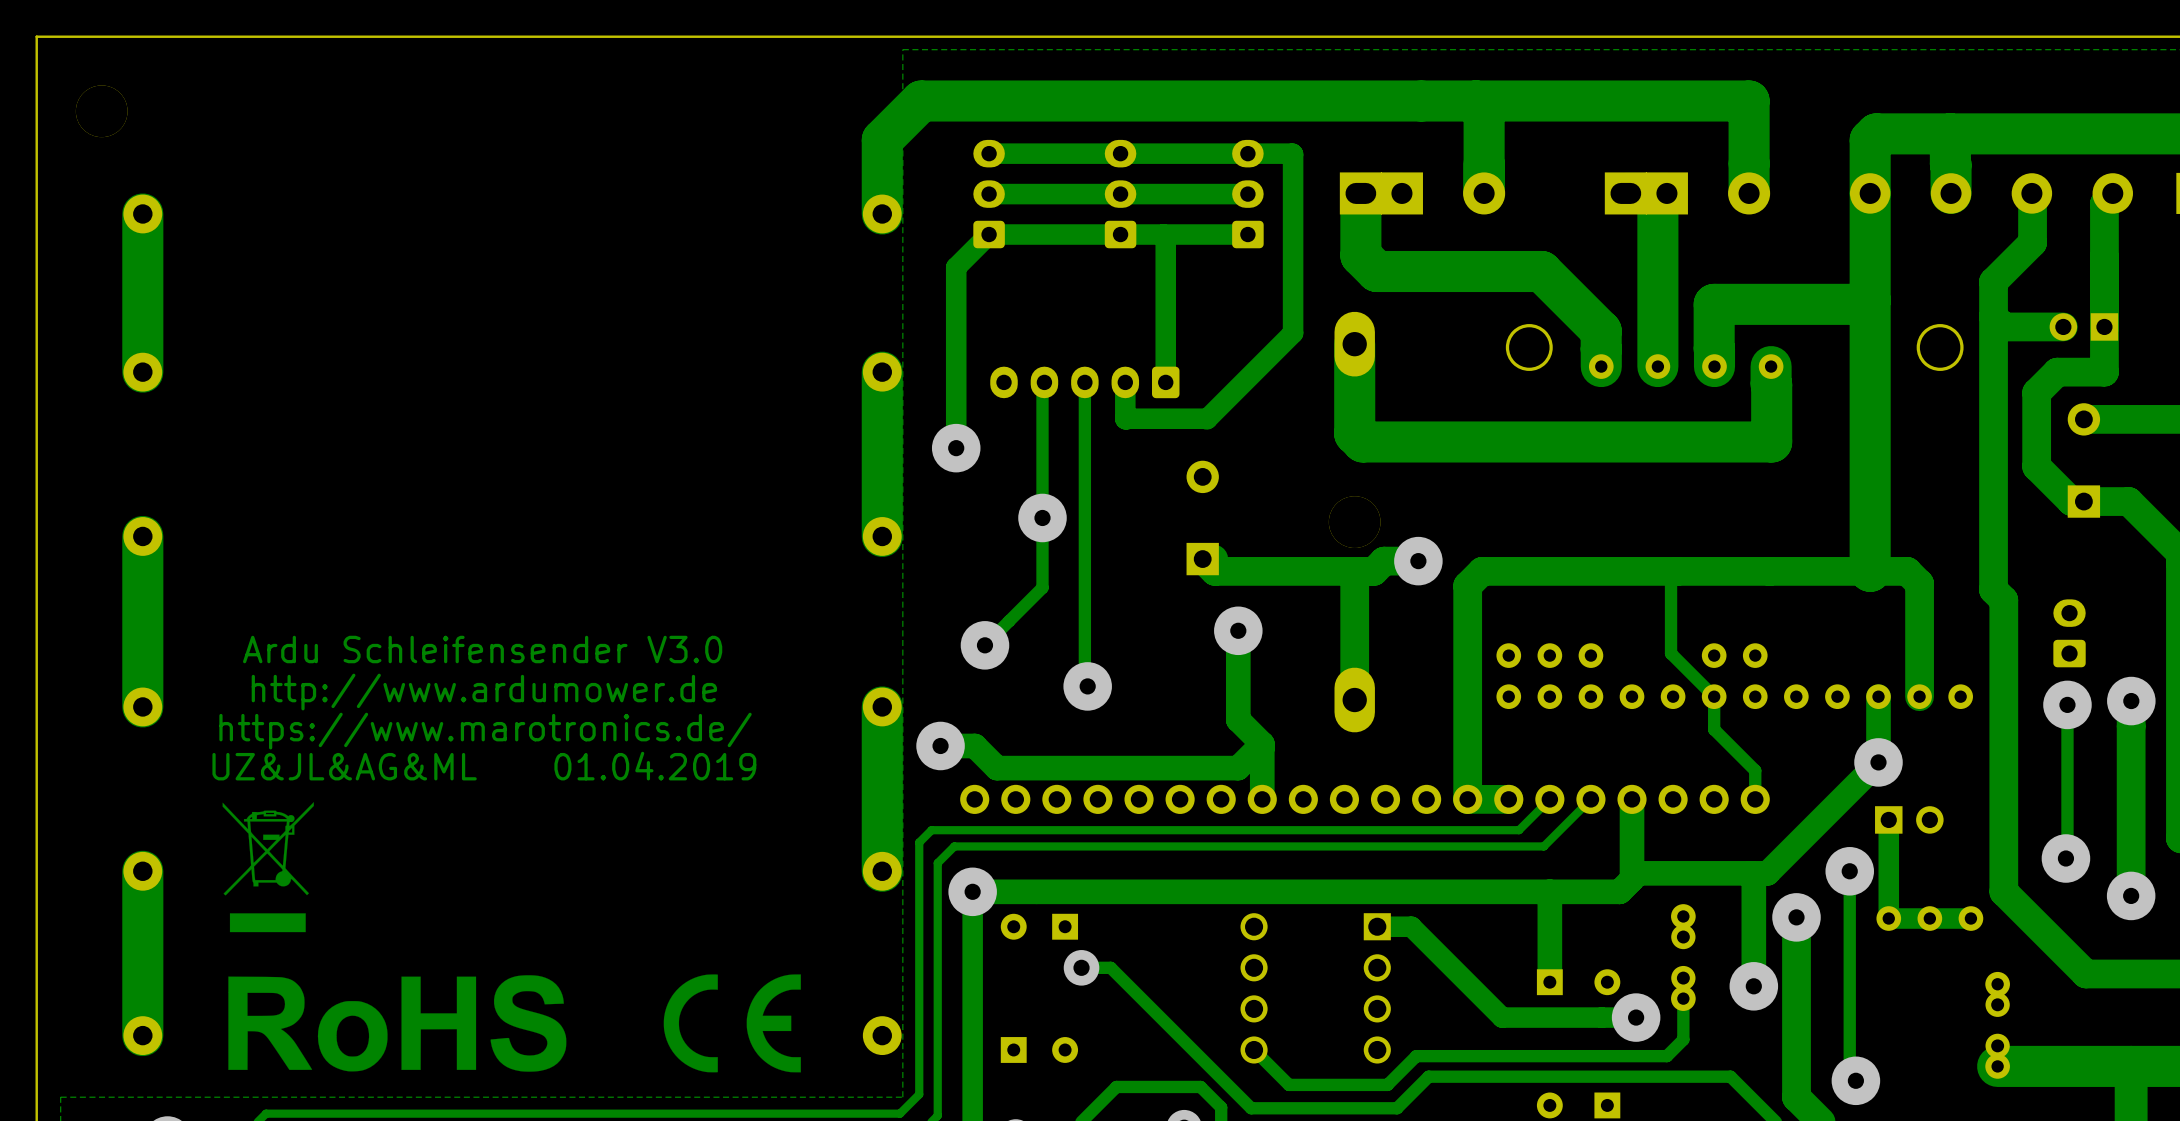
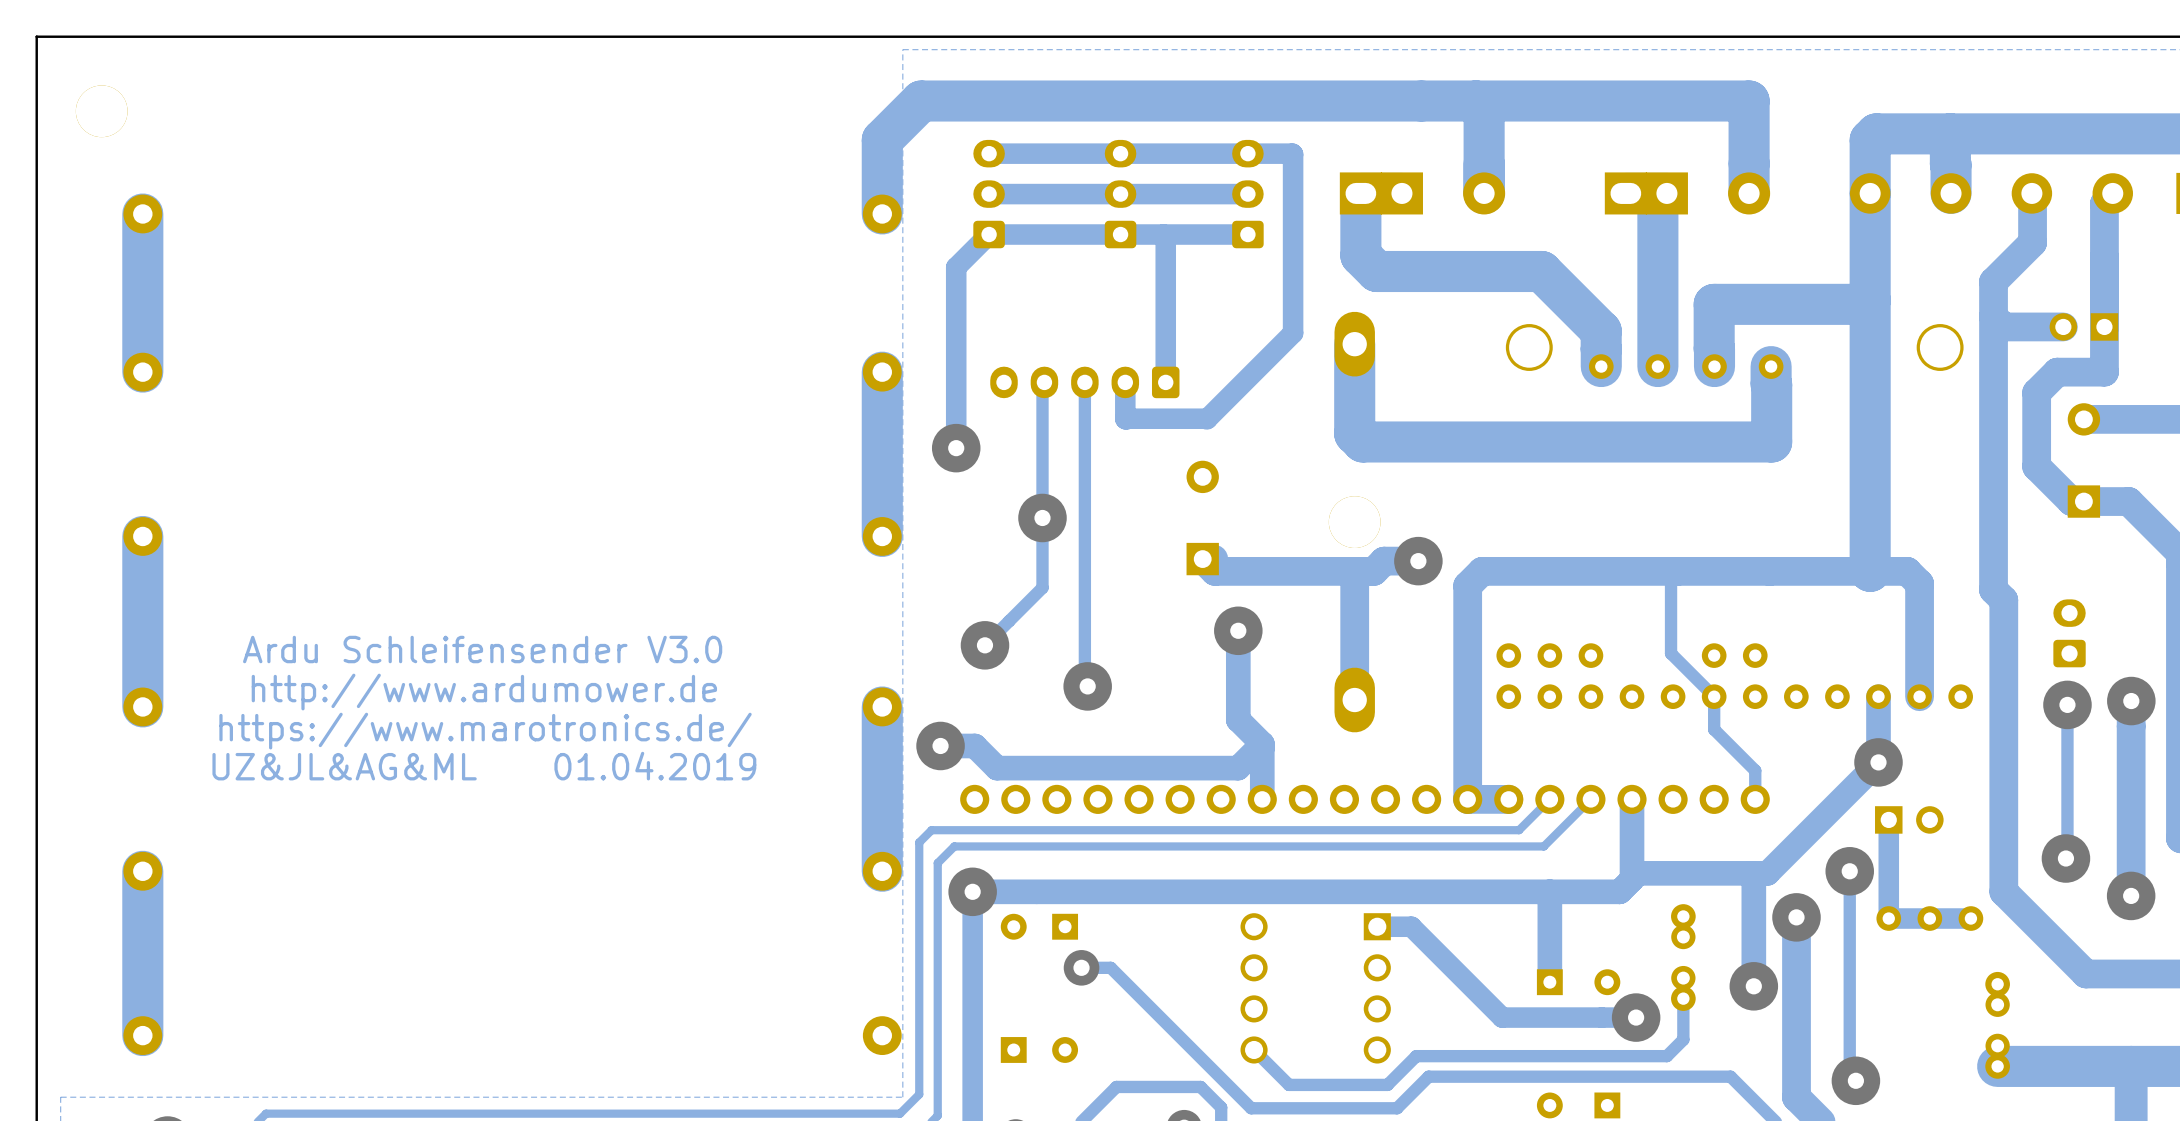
drawing: [222, 802, 314, 933] -> none
drawing: [663, 974, 801, 1073] -> none
drawing: [228, 975, 567, 1072] -> none

